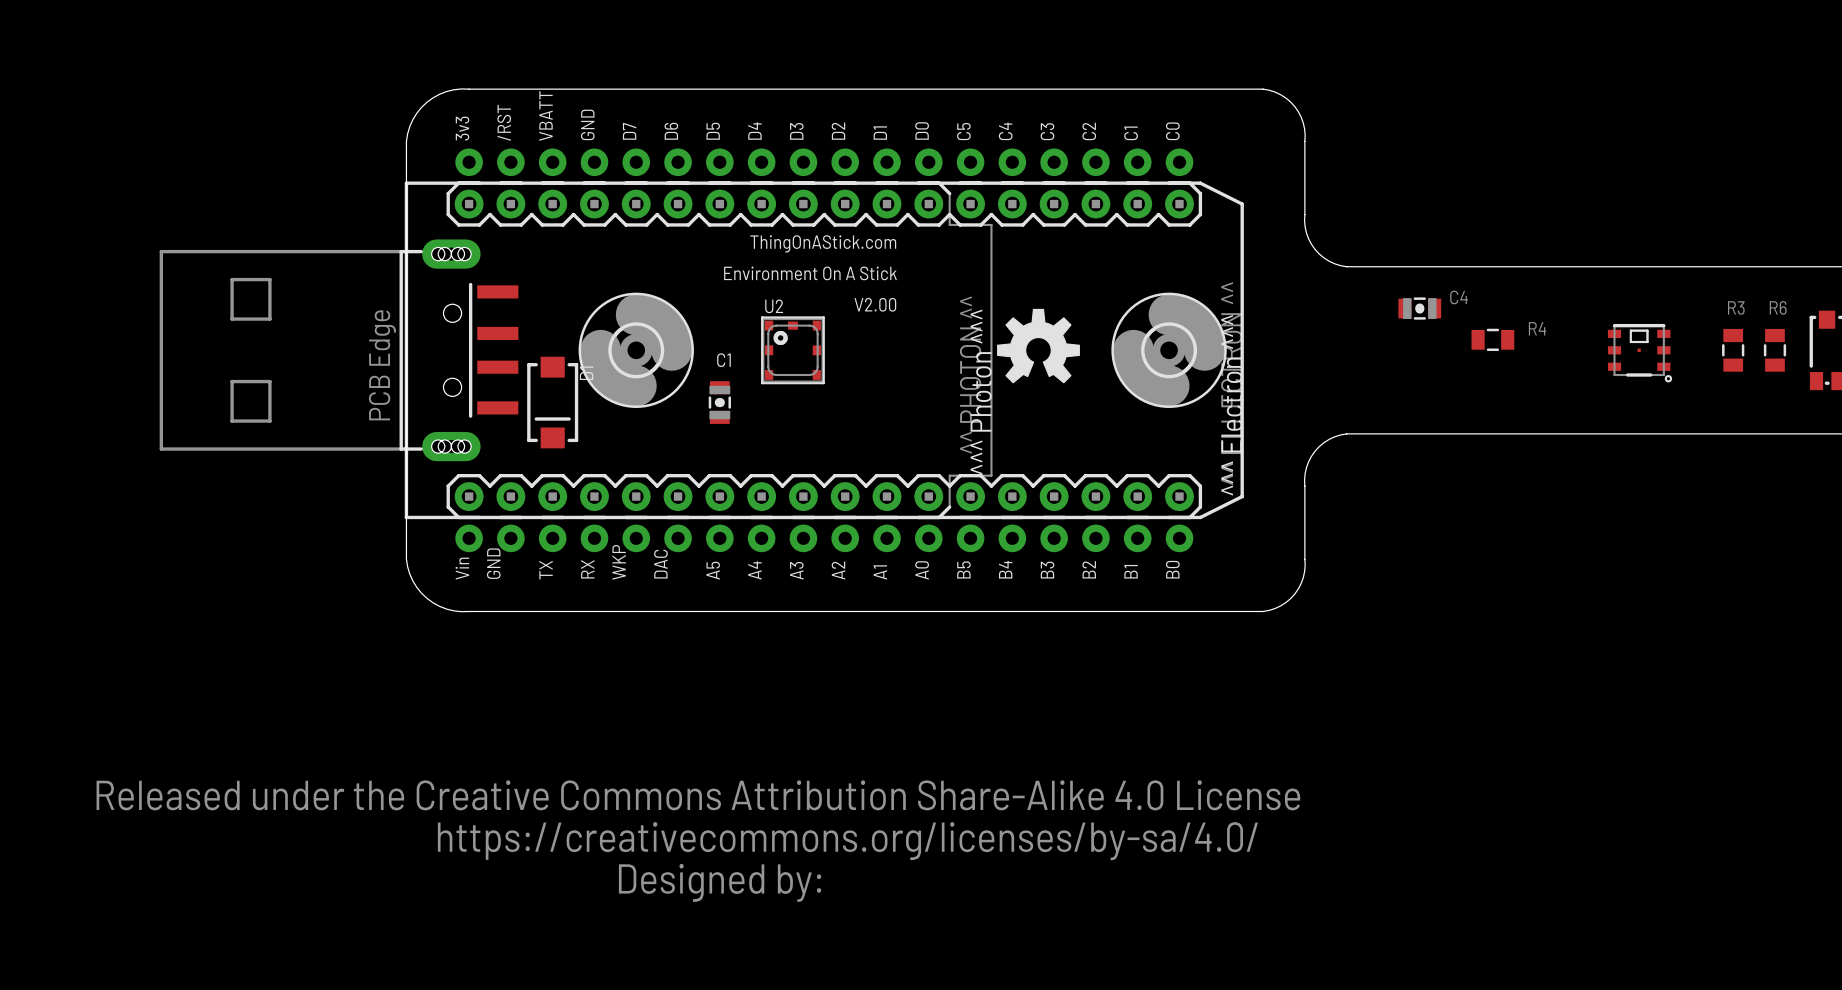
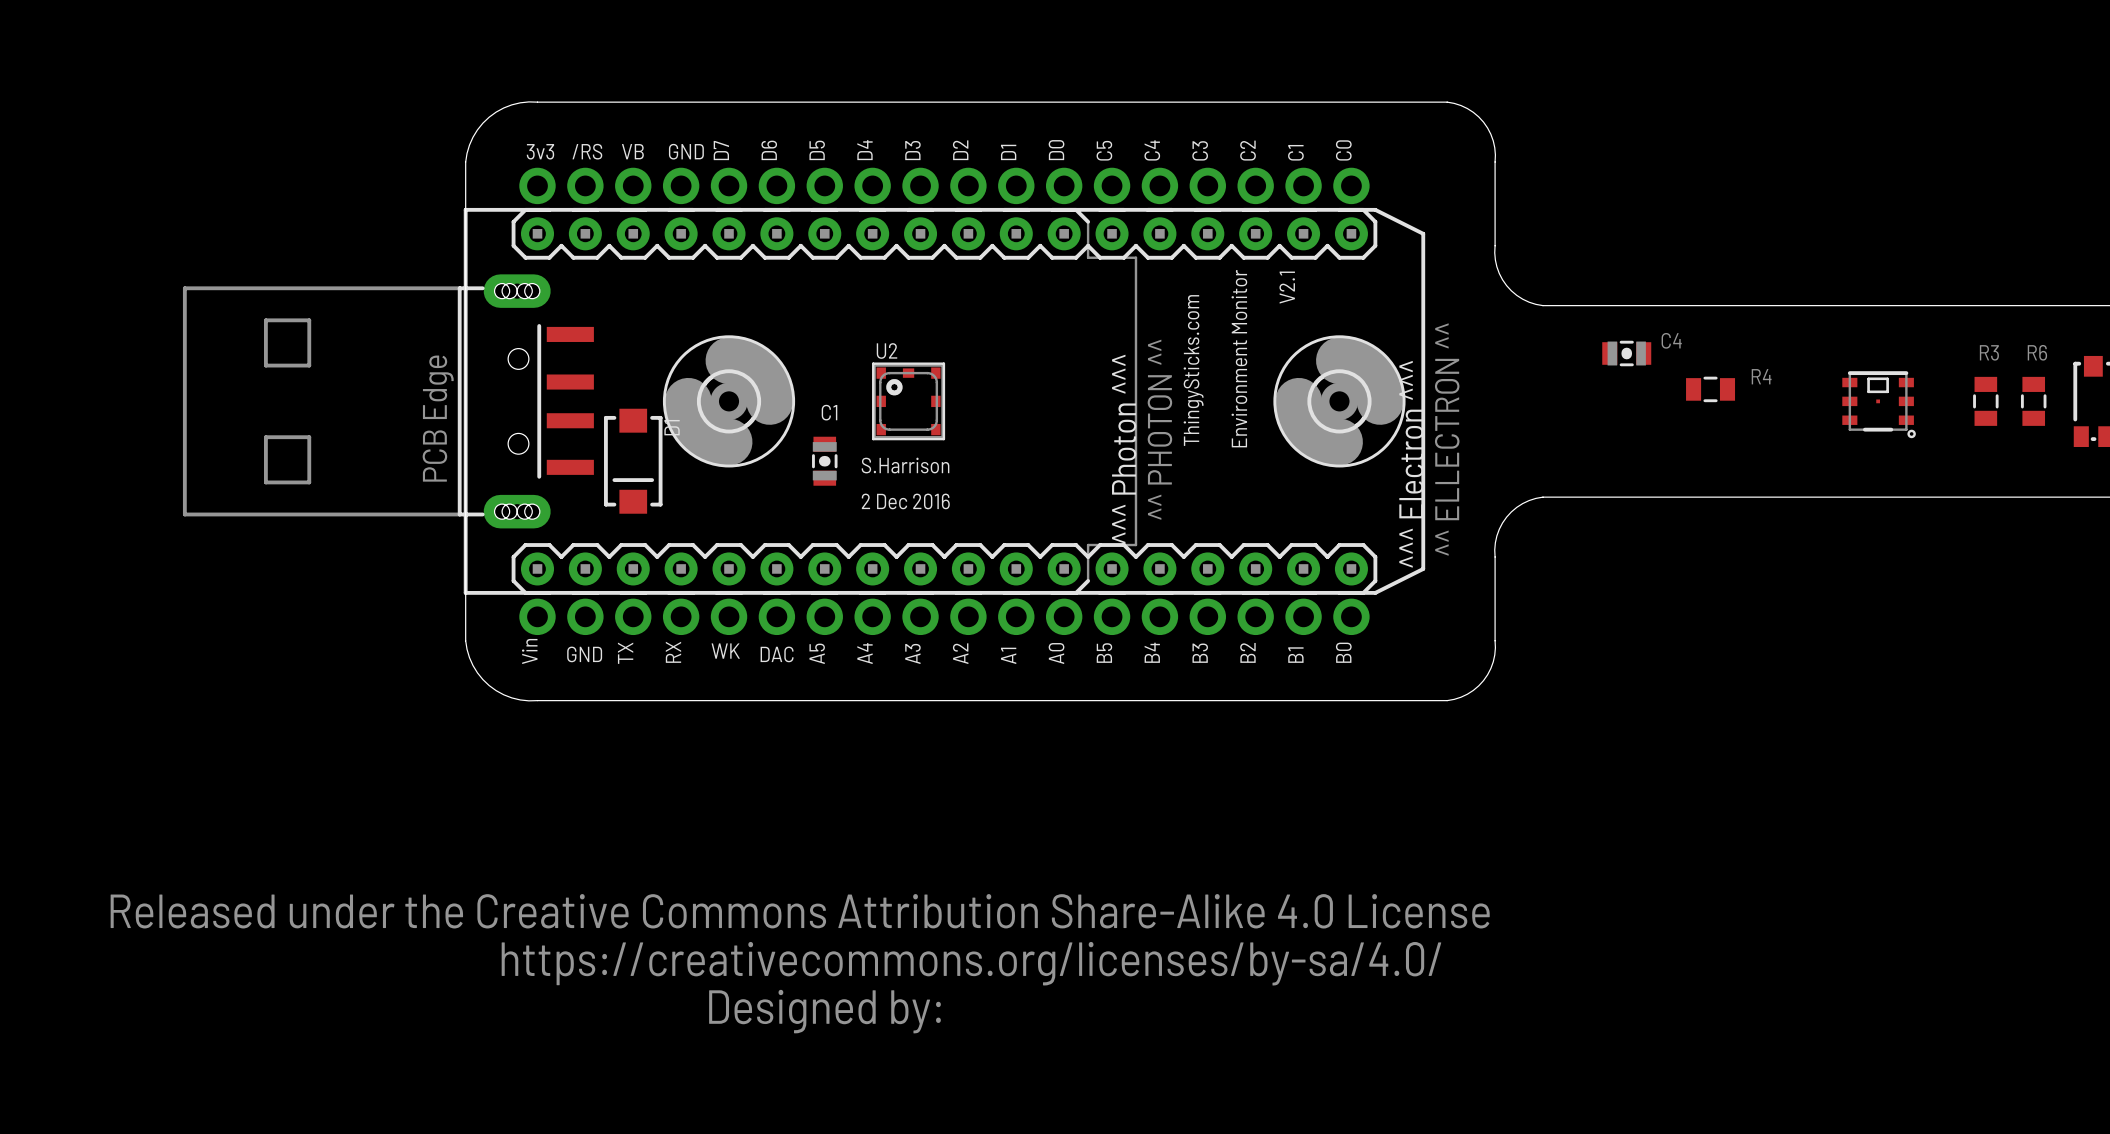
part footprint: [404, 148, 1244, 553] -> [463, 167, 1426, 636]
text: ThingOnAStick.com (823, 243) -> none
text: none -> V2.1 (1287, 287)
text: Environment On A Stick (810, 273) -> none
text: V2.00 (875, 304) -> none
drawing: [997, 308, 1080, 384] -> none
text: none -> Environment Monitor (1239, 358)
text: none -> ThingySticks.com (1193, 370)
text: none -> S.Harrison (905, 465)
text: none -> 2 Dec 2016 (905, 501)

